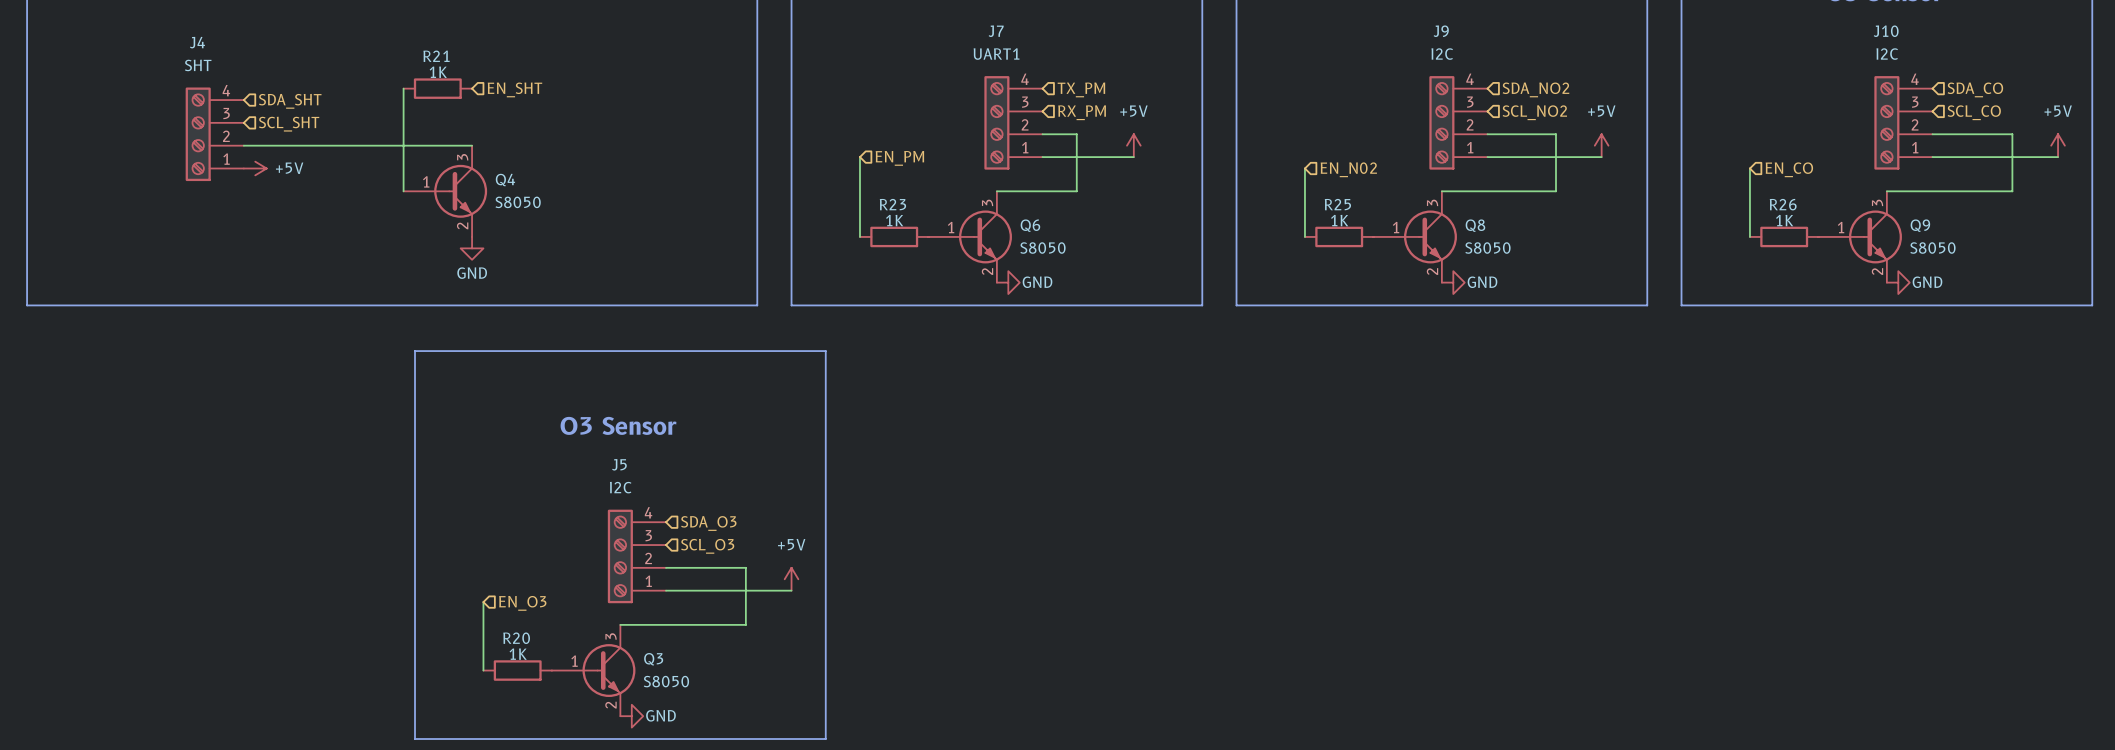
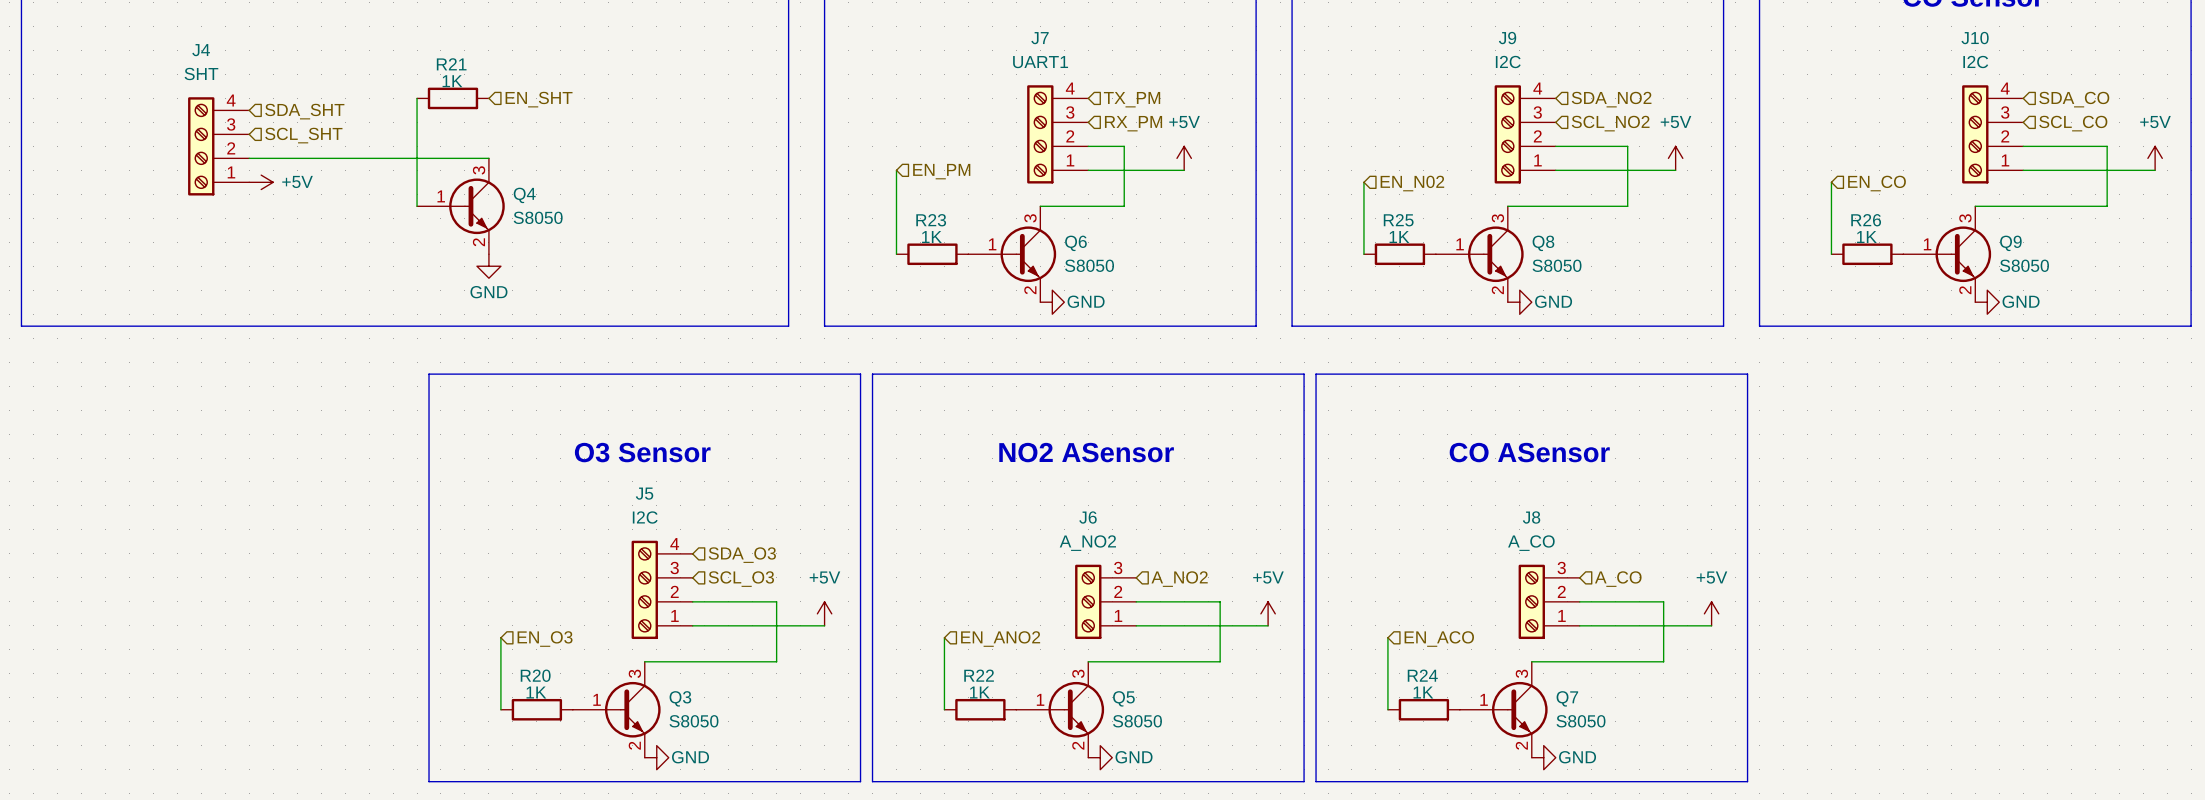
line: none -> (872, 374) (1304, 374) (1304, 781) (872, 781) (872, 374)
line: none -> (1316, 374) (1747, 374) (1747, 781) (1316, 781) (1316, 374)
text: none -> NO2 ASensor (1086, 452)
text: none -> CO ASensor (1529, 452)
hierarchical label: none -> A_NO2 (1179, 579)
hierarchical label: none -> A_CO (1618, 579)
J6: none -> A_NO2 (1105, 601)
wire: none -> (1136, 601) (1220, 601) (1220, 661) (1088, 661)
J8: none -> A_CO (1549, 601)
wire: none -> (1579, 601) (1663, 601) (1663, 661) (1531, 661)
power symbol: none -> +5V (1268, 613)
power symbol: none -> +5V (1711, 613)
wire: none -> (1136, 625) (1268, 625)
wire: none -> (1579, 625) (1711, 625)
wire: none -> (944, 637) (944, 709)
wire: none -> (1387, 637) (1387, 709)
hierarchical label: none -> EN_ANO2 (1000, 639)
hierarchical label: none -> EN_ACO (1439, 639)
R22: none -> 1K (980, 709)
Q5: none -> S8050 (1060, 709)
R24: none -> 1K (1423, 709)
Q7: none -> S8050 (1503, 709)
power symbol: none -> GND (1100, 757)
power symbol: none -> GND (1543, 757)

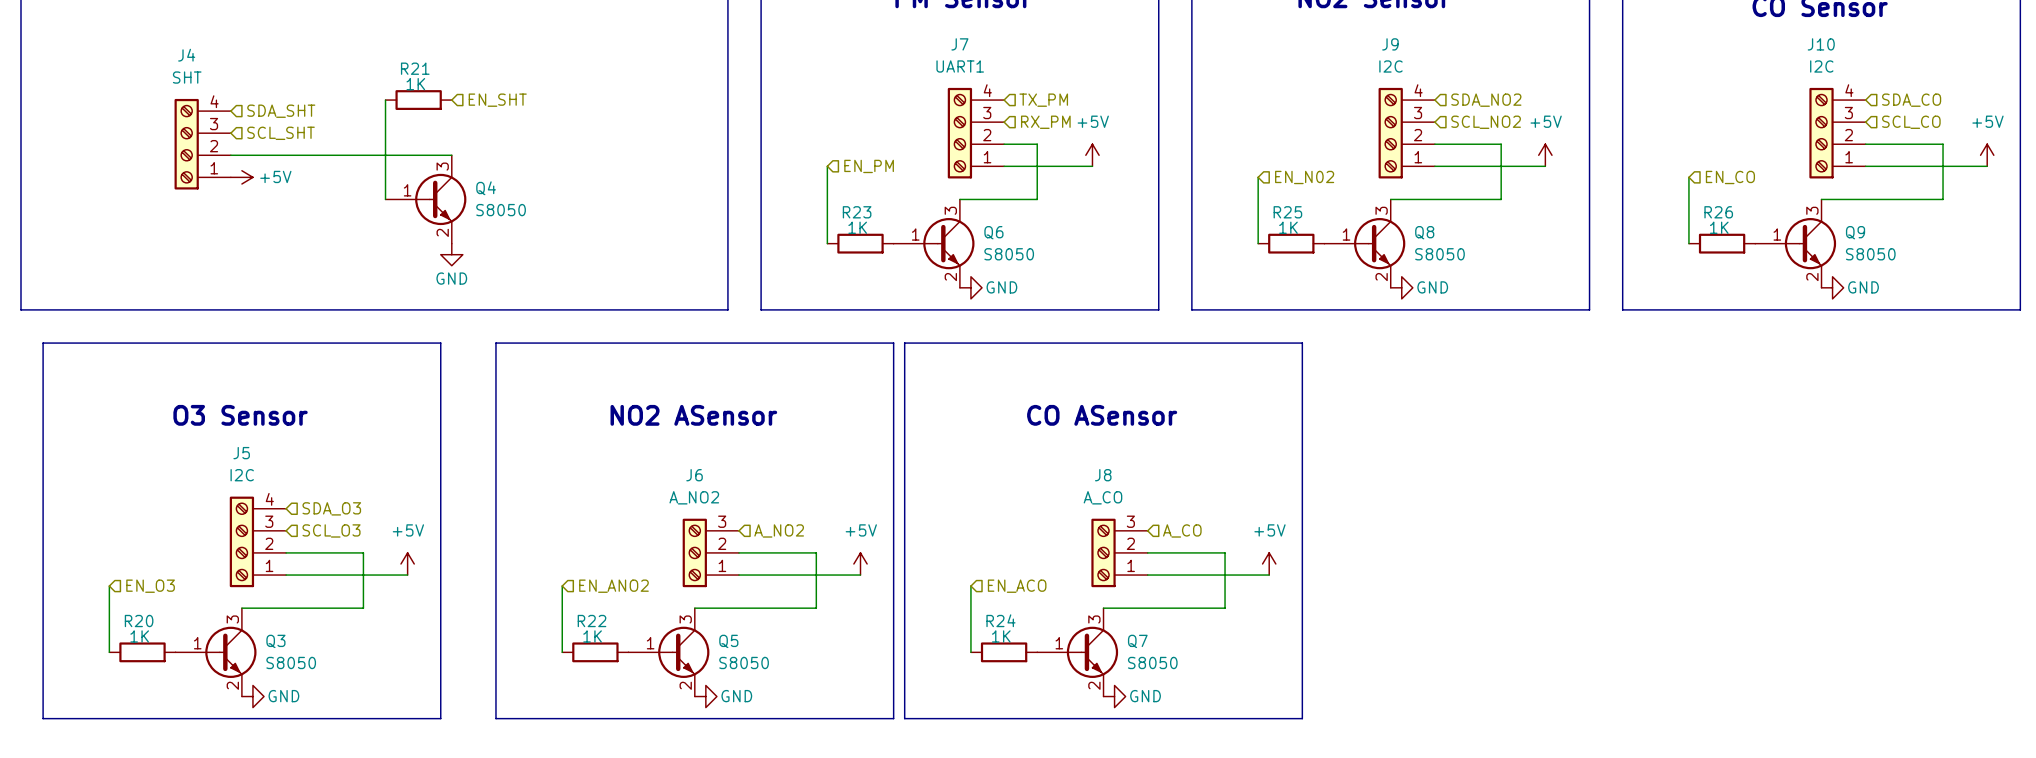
line: none -> (43, 343) (440, 343) (440, 718) (43, 718) (43, 343)
line: (429, 374) (860, 374) (860, 781) (429, 781) (429, 374) -> (495, 343) (893, 343) (893, 718) (495, 718) (495, 343)
line: (872, 374) (1304, 374) (1304, 781) (872, 781) (872, 374) -> (904, 343) (1302, 343) (1302, 718) (904, 718) (904, 343)
line: (1316, 374) (1747, 374) (1747, 781) (1316, 781) (1316, 374) -> none
text: none -> O3 Sensor (240, 415)
text: O3 Sensor (642, 452) -> NO2 ASensor (693, 415)
text: NO2 ASensor (1086, 452) -> CO ASensor (1102, 415)
text: CO ASensor (1529, 452) -> none
hierarchical label: none -> SDA_O3 (331, 508)
hierarchical label: SDA_O3 (742, 555) -> none
hierarchical label: none -> SCL_O3 (331, 530)
hierarchical label: none -> A_NO2 (779, 530)
hierarchical label: none -> A_CO (1182, 530)
hierarchical label: SCL_O3 (741, 579) -> none
hierarchical label: A_NO2 (1179, 579) -> none
hierarchical label: A_CO (1618, 579) -> none
wire: none -> (286, 552) (363, 552) (363, 608) (241, 608)
J5 position: (662, 589) -> (257, 541)
power symbol: none -> +5V (407, 563)
wire: (692, 601) (776, 601) (776, 661) (644, 661) -> (738, 552) (816, 552) (816, 608) (694, 608)
J6 position: (1105, 601) -> (710, 552)
wire: (1136, 601) (1220, 601) (1220, 661) (1088, 661) -> (1147, 552) (1225, 552) (1225, 608) (1103, 608)
J8 position: (1549, 601) -> (1119, 552)
wire: (1579, 601) (1663, 601) (1663, 661) (1531, 661) -> none
wire: none -> (286, 575) (407, 575)
power symbol position: +5V (824, 613) -> +5V (860, 563)
power symbol position: +5V (1268, 613) -> +5V (1269, 563)
power symbol: +5V (1711, 613) -> none
wire: none -> (109, 586) (109, 652)
wire: (692, 625) (824, 625) -> (738, 575) (860, 575)
wire: (1136, 625) (1268, 625) -> (1147, 575) (1269, 575)
wire: (1579, 625) (1711, 625) -> none
hierarchical label: none -> EN_O3 (150, 586)
hierarchical label: none -> EN_ANO2 (613, 586)
hierarchical label: none -> EN_ACO (1017, 586)
wire: (500, 637) (500, 709) -> (562, 586) (562, 652)
wire: (944, 637) (944, 709) -> (970, 586) (970, 652)
wire: (1387, 637) (1387, 709) -> none
hierarchical label: EN_O3 (545, 639) -> none
hierarchical label: EN_ANO2 (1000, 639) -> none
hierarchical label: EN_ACO (1439, 639) -> none
R20 position: (536, 709) -> (142, 652)
Q3 position: (616, 709) -> (216, 652)
R22 position: (980, 709) -> (595, 652)
Q5 position: (1060, 709) -> (668, 652)
R24 position: (1423, 709) -> (1004, 652)
Q7 position: (1503, 709) -> (1077, 652)
power symbol: none -> GND (252, 696)
power symbol position: GND (656, 757) -> GND (705, 696)
power symbol position: GND (1100, 757) -> GND (1114, 696)
power symbol: GND (1543, 757) -> none

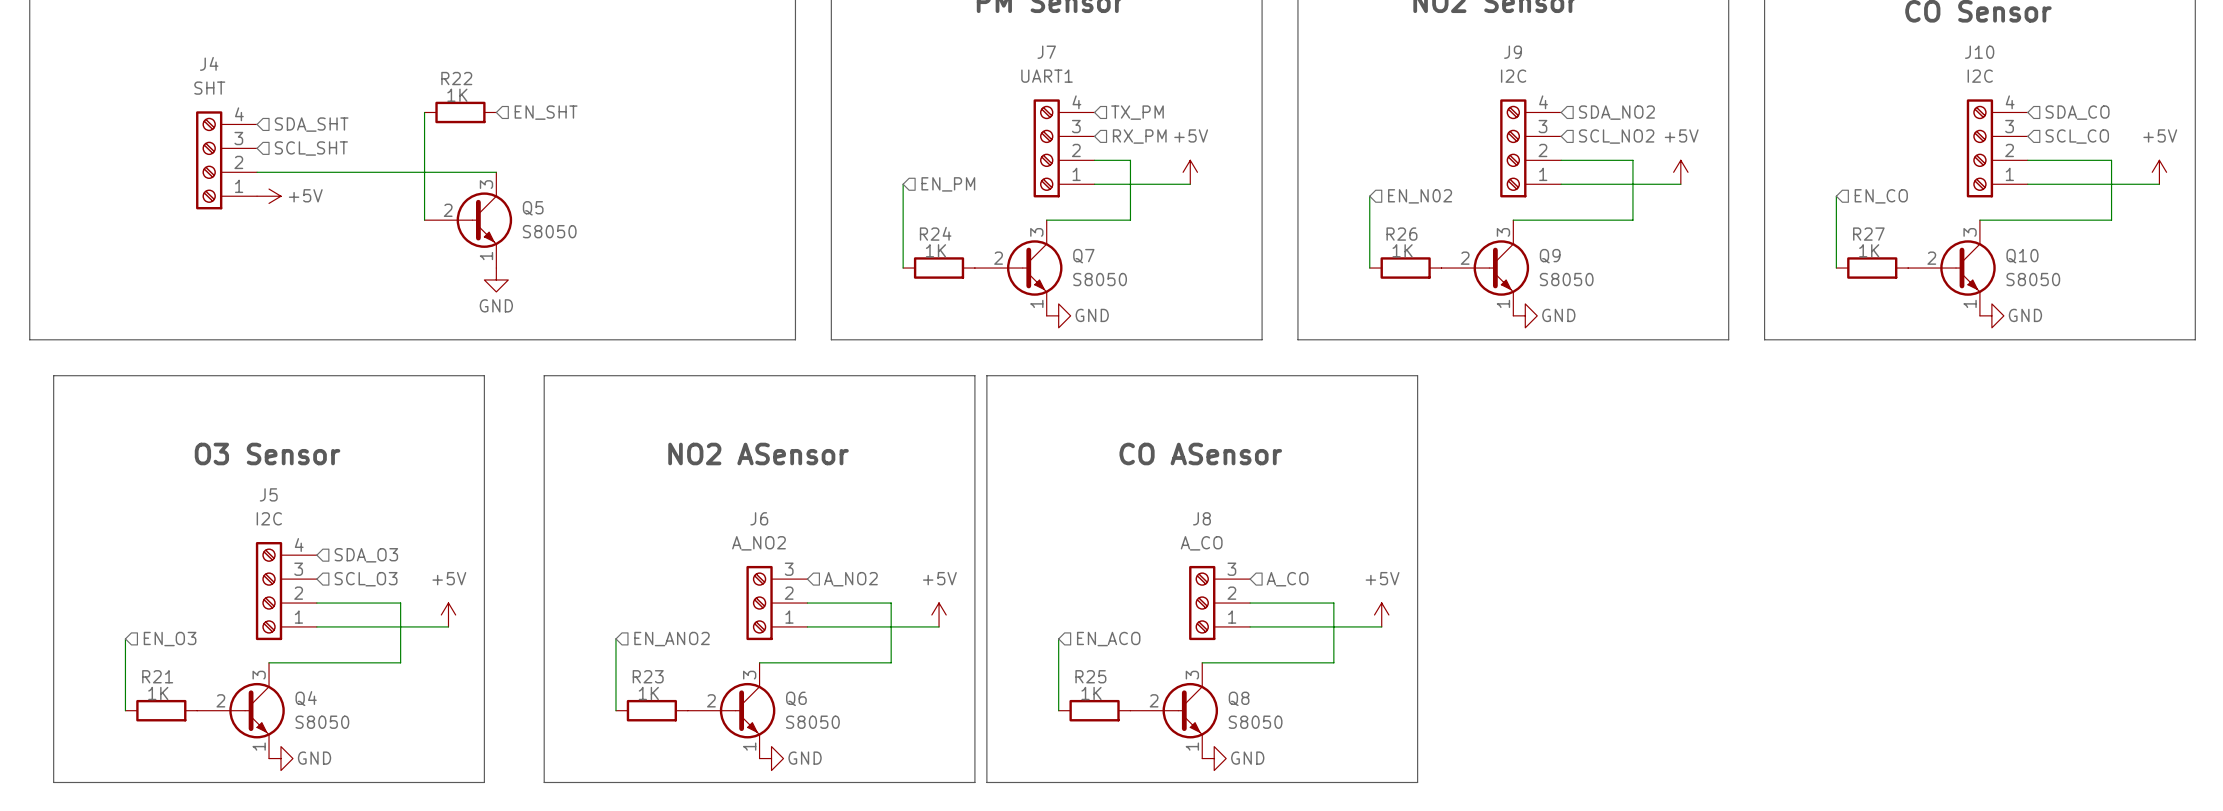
R21 name: R21 (415, 68) -> R22 (456, 78)
Q4 pin number: 1 (407, 190) -> 2 (220, 700)
Q4 position: (425, 199) -> (241, 710)
R23 name: R23 (857, 212) -> R24 (935, 233)
R25 name: R25 (1287, 212) -> R26 (1401, 234)
R26 name: R26 (1718, 212) -> R27 (1868, 234)
Q4 pin number: 2 (442, 232) -> 1 (259, 746)
Q6 pin number: 1 (915, 234) -> 2 (711, 700)
Q8 pin number: 1 (1346, 234) -> 2 (1154, 700)
Q9 pin number: 1 (1777, 234) -> 2 (1465, 258)
Q6 position: (934, 243) -> (731, 710)
Q8 position: (1364, 243) -> (1174, 710)
Q9 position: (1795, 243) -> (1485, 268)
Q10: none -> S8050 (1951, 268)
Q6 pin number: 2 (950, 277) -> 1 (749, 746)
Q8 pin number: 2 (1381, 277) -> 1 (1192, 746)
Q9 pin number: 2 (1812, 277) -> 1 (1503, 303)
R24 name: R24 (1000, 620) -> R25 (1090, 676)
R20 name: R20 (139, 621) -> R21 (157, 676)
R22 name: R22 (591, 621) -> R23 (648, 676)
Q5 pin number: 1 (650, 643) -> 2 (448, 210)
Q7 pin number: 1 (1059, 643) -> 2 (998, 258)
Q3: S8050 (216, 652) -> none
Q5 position: (668, 652) -> (468, 220)
Q7 position: (1077, 652) -> (1018, 268)
Q5 pin number: 2 (685, 685) -> 1 (486, 256)
Q7 pin number: 2 (1094, 685) -> 1 (1036, 303)

